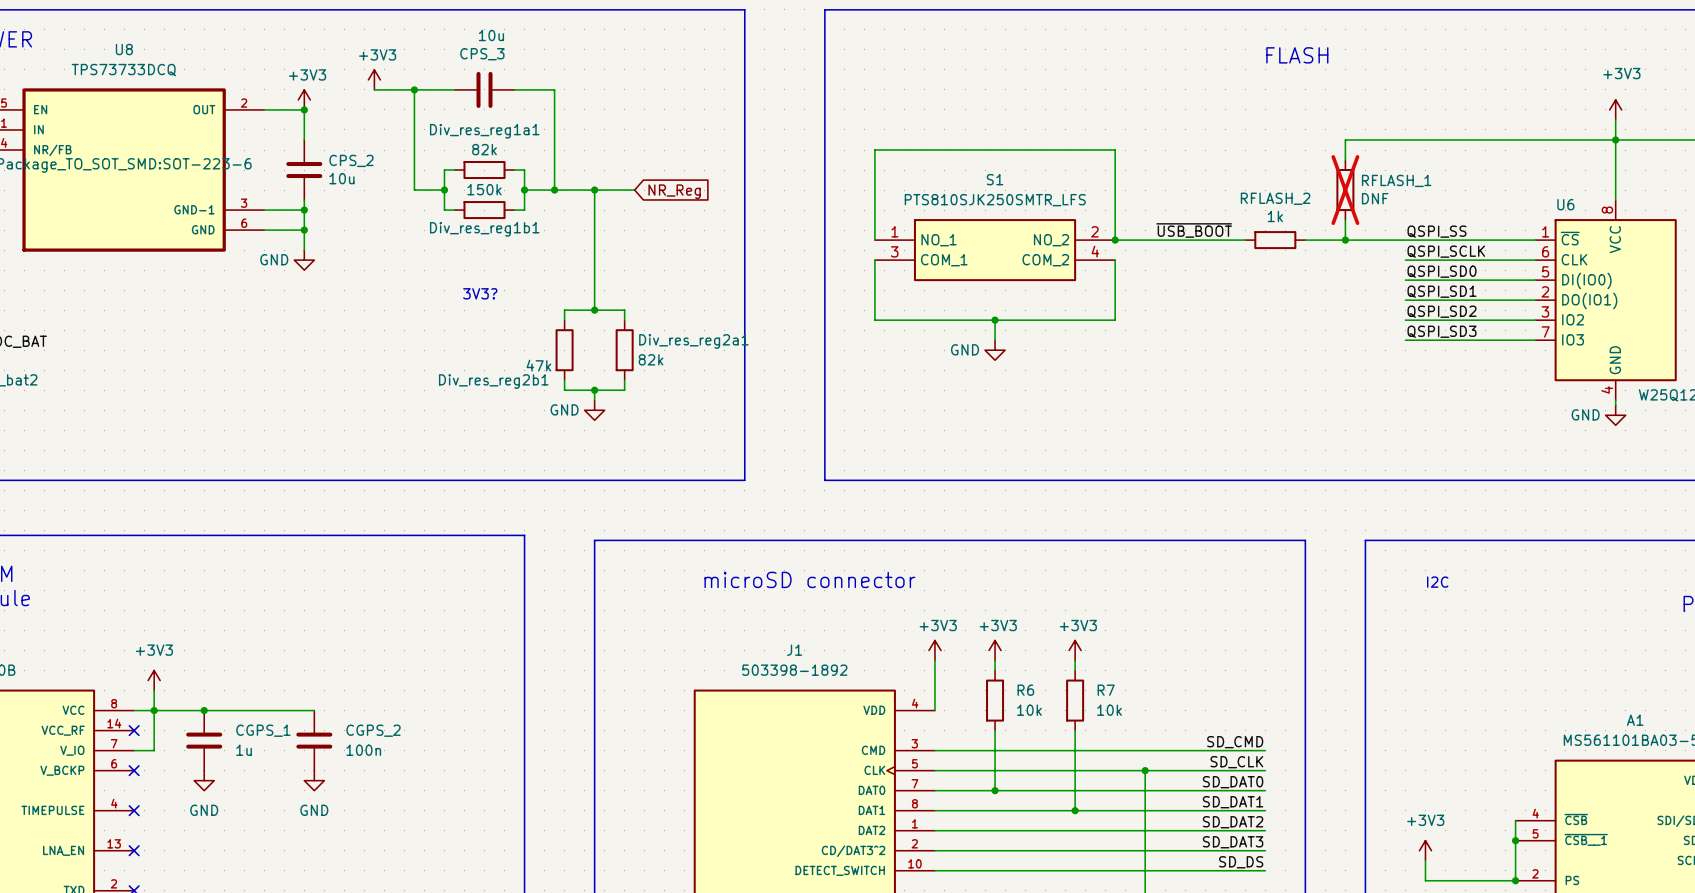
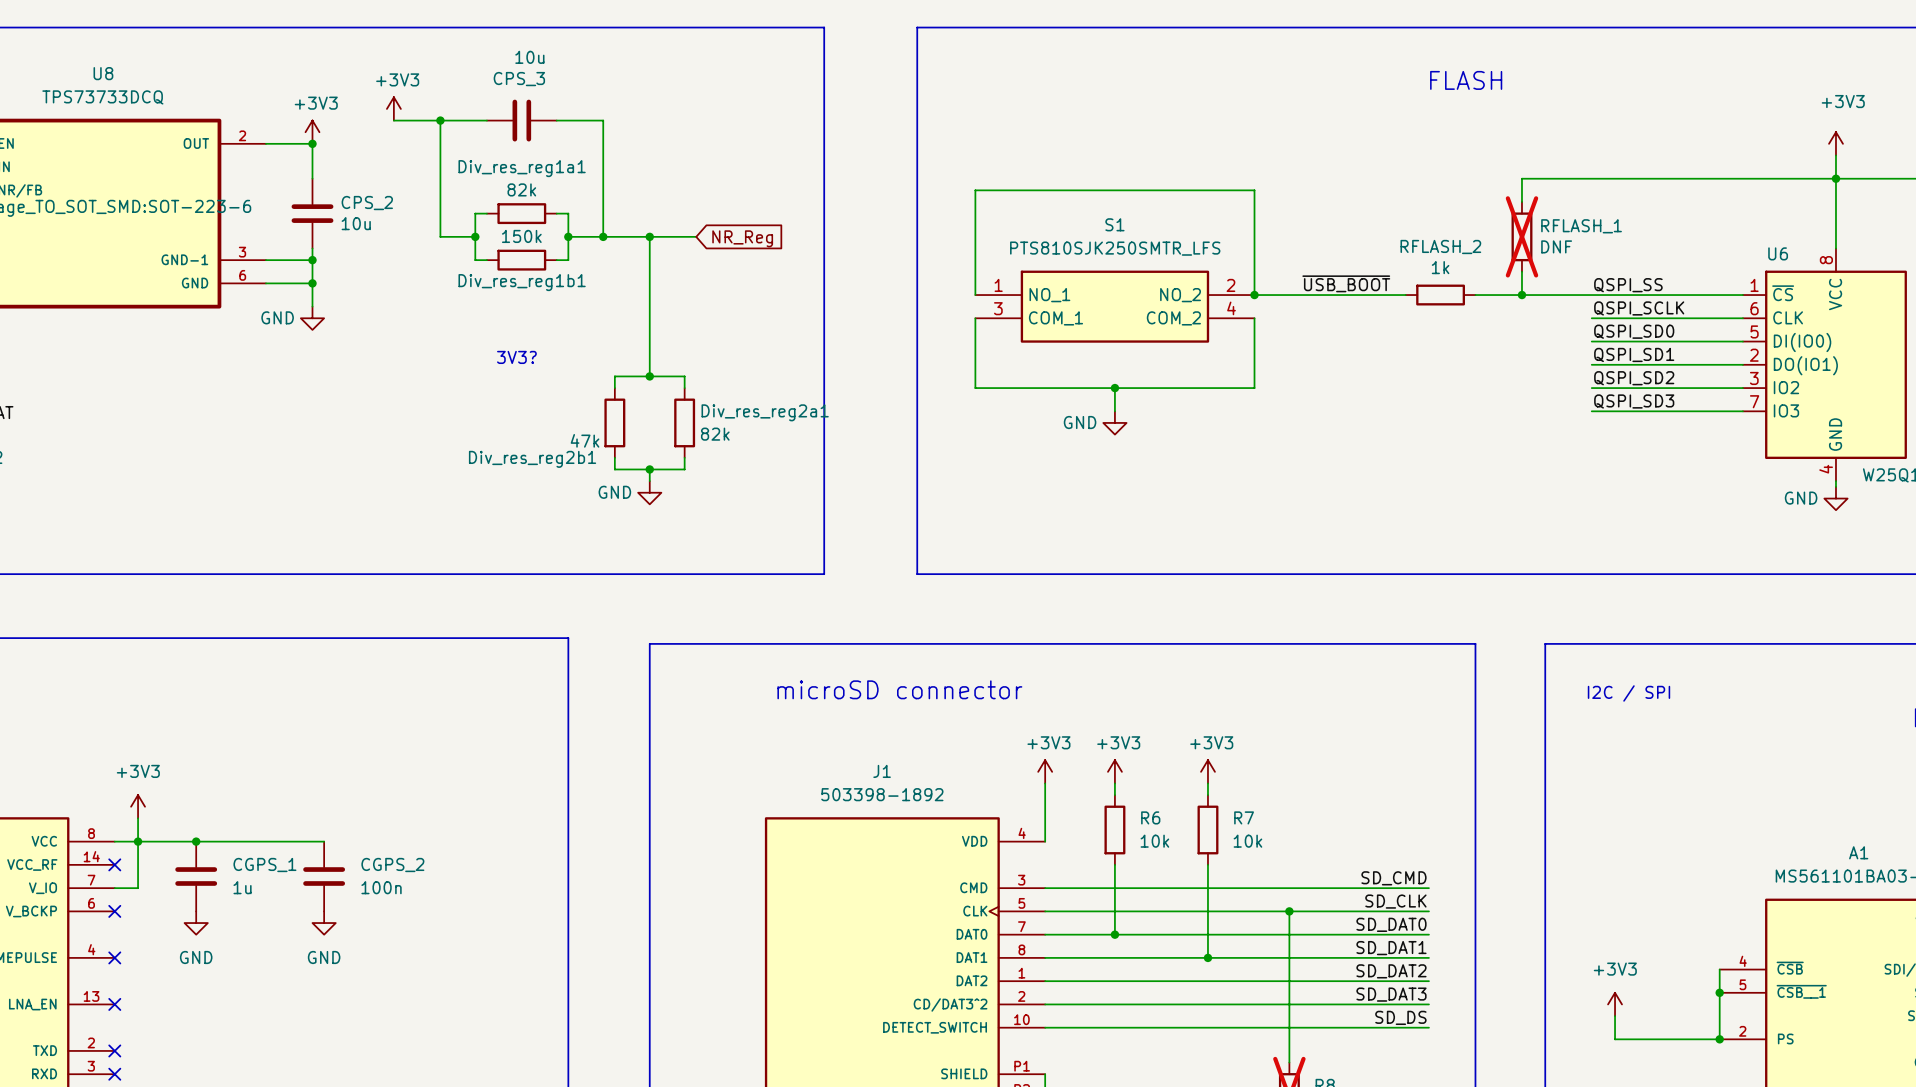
text: I2C (1437, 582) -> I2C / SPI (1628, 693)

